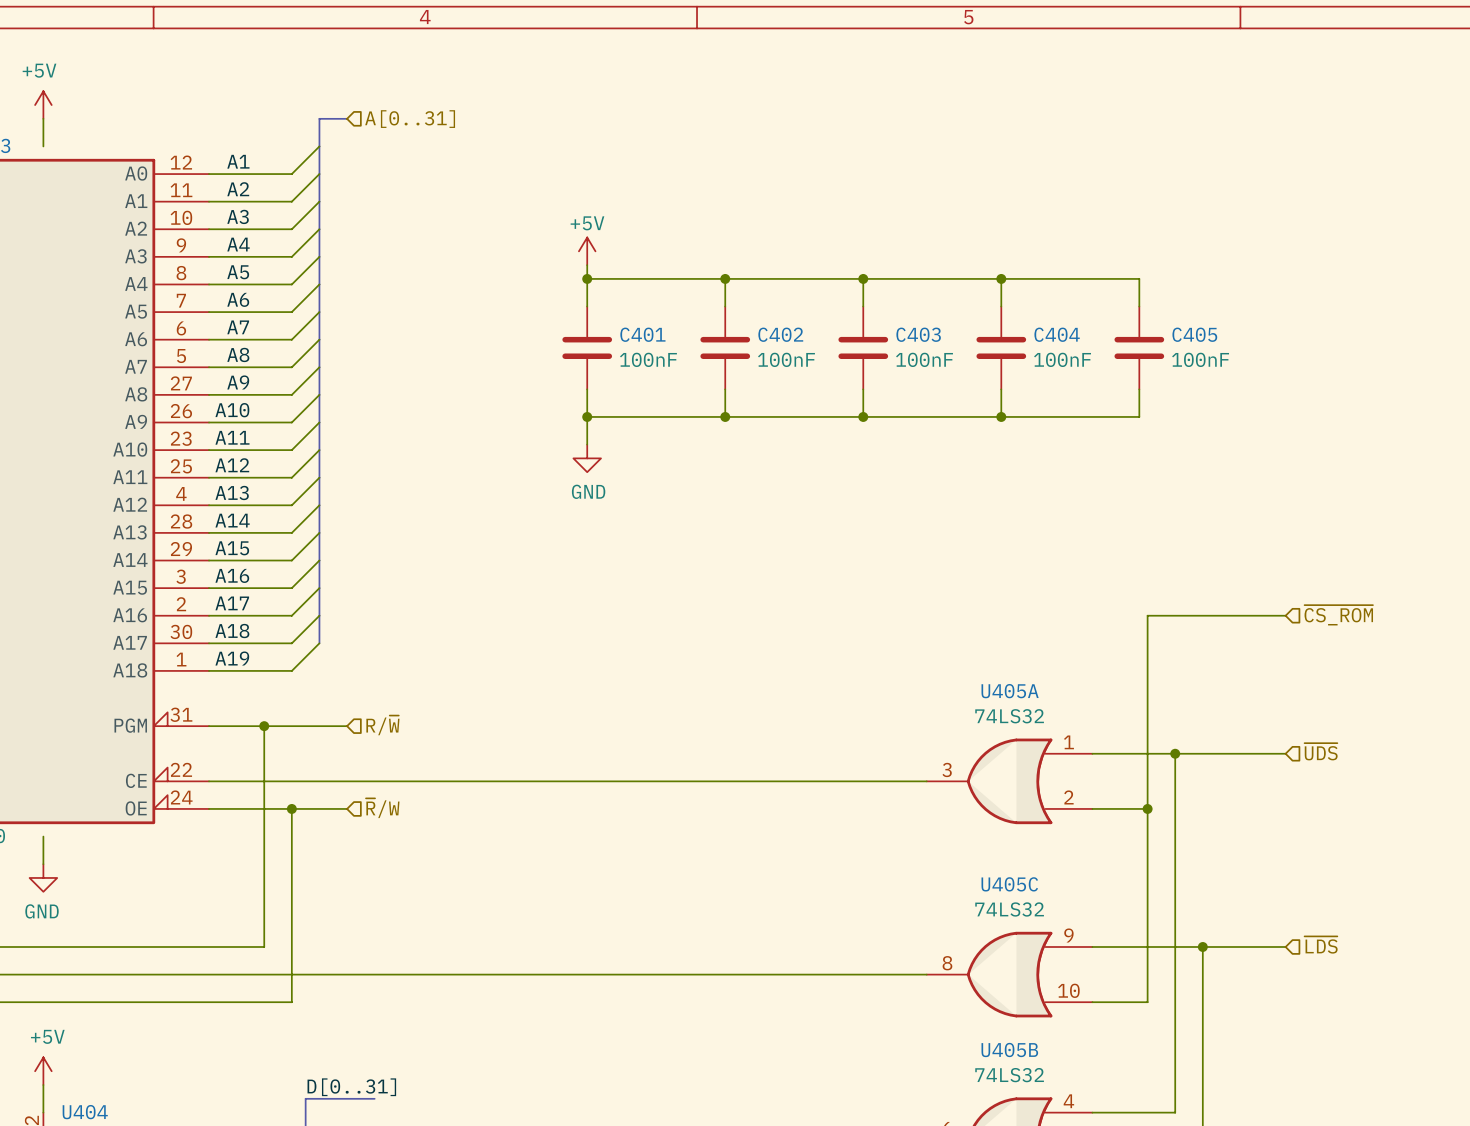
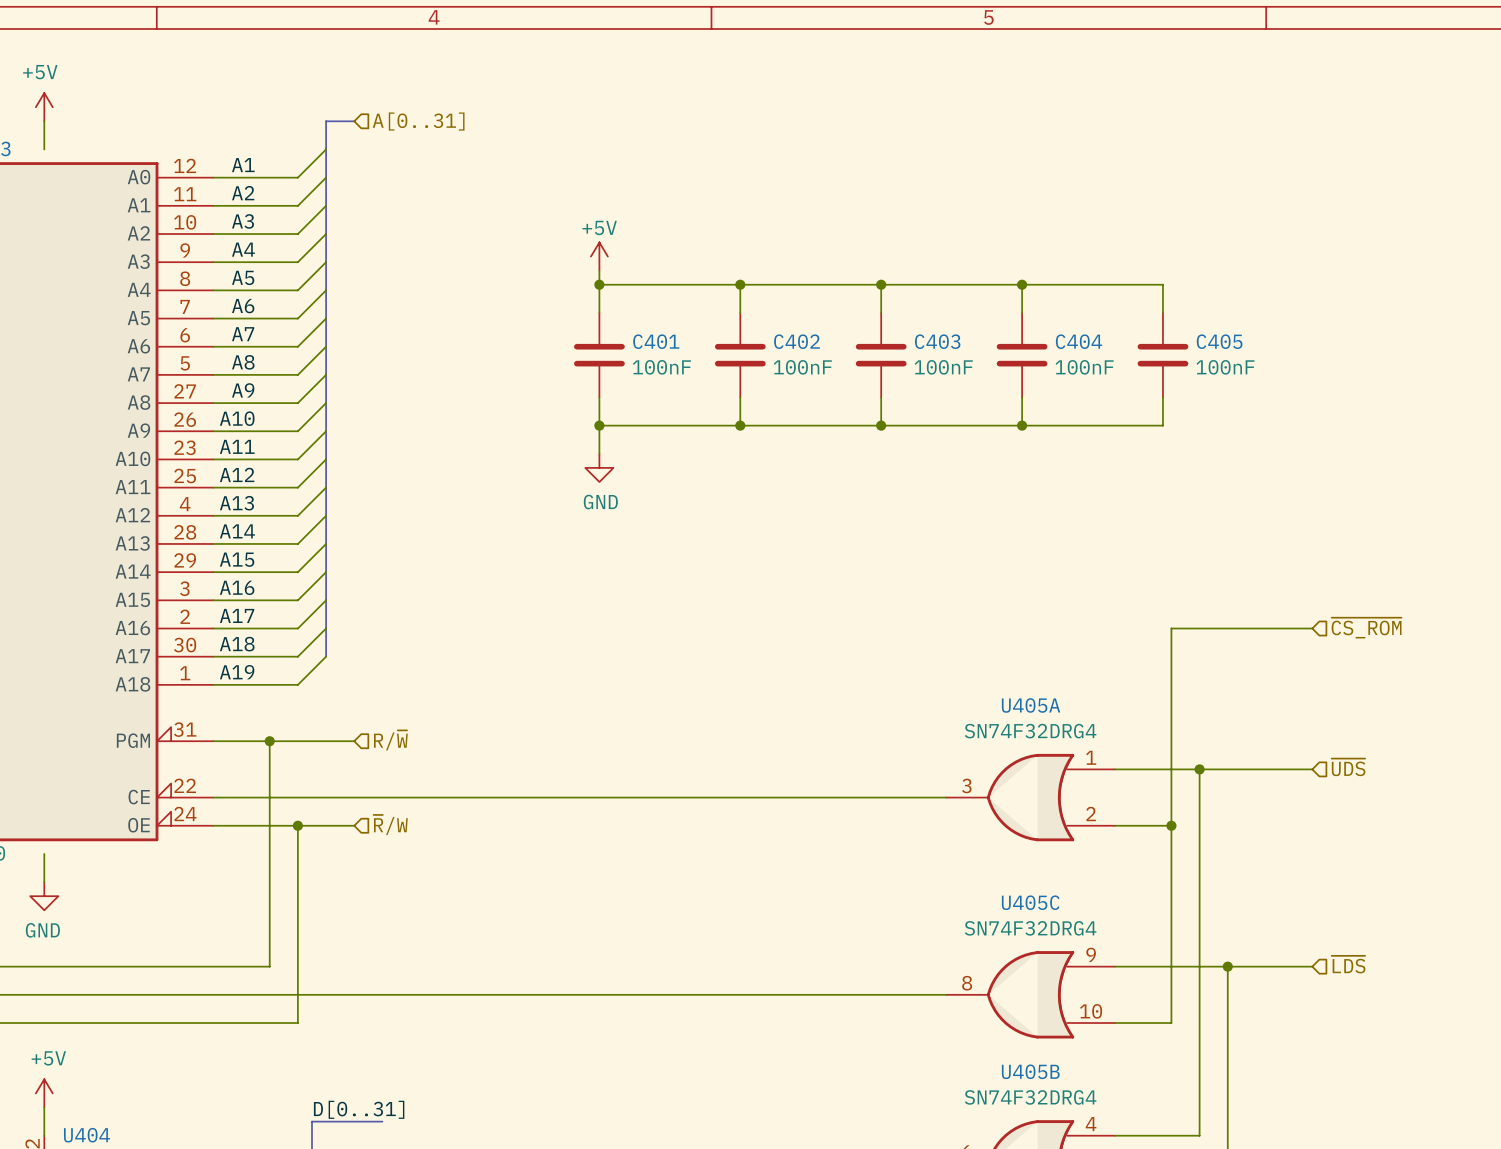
U405A value: 74LS32 (1009, 716) -> SN74F32DRG4 (1030, 731)
U405C value: 74LS32 (1009, 909) -> SN74F32DRG4 (1030, 928)
U405B value: 74LS32 (1009, 1075) -> SN74F32DRG4 (1030, 1097)

